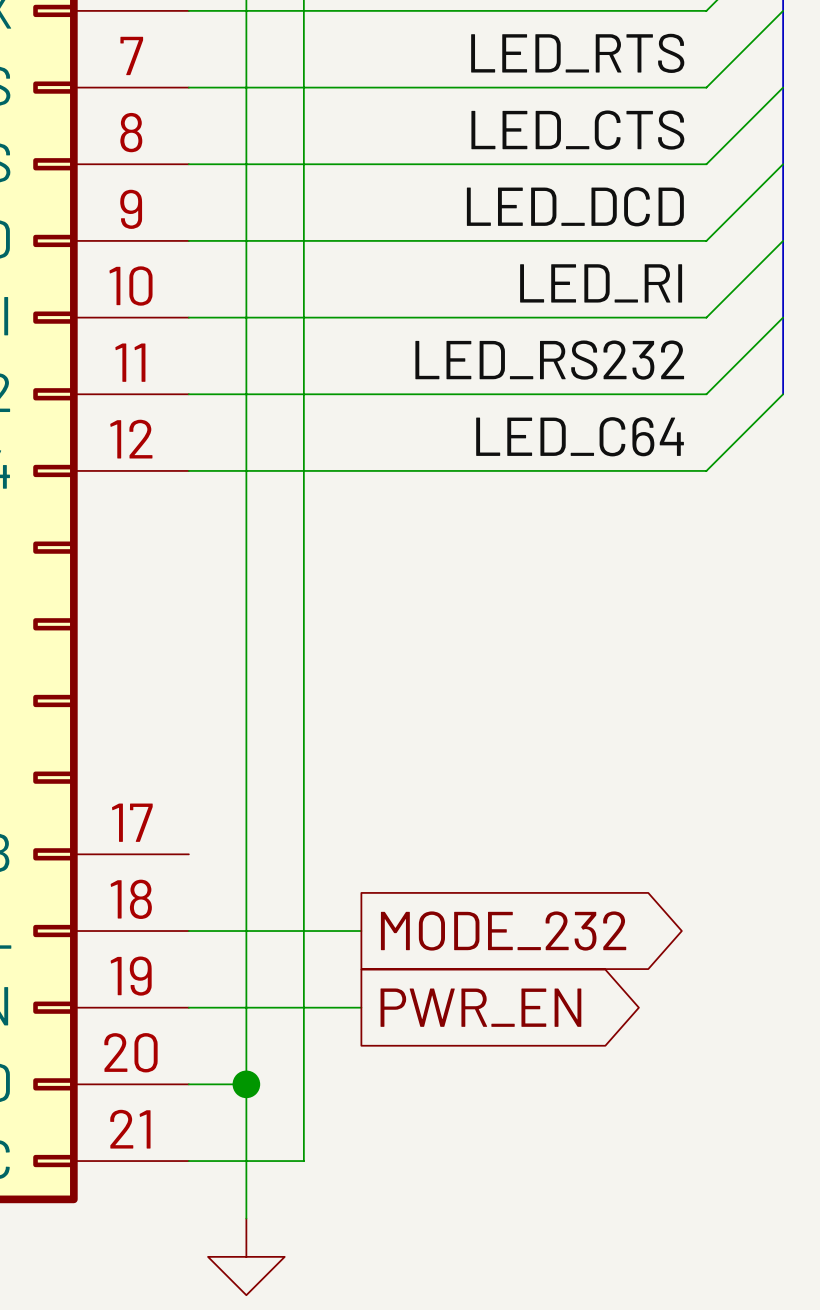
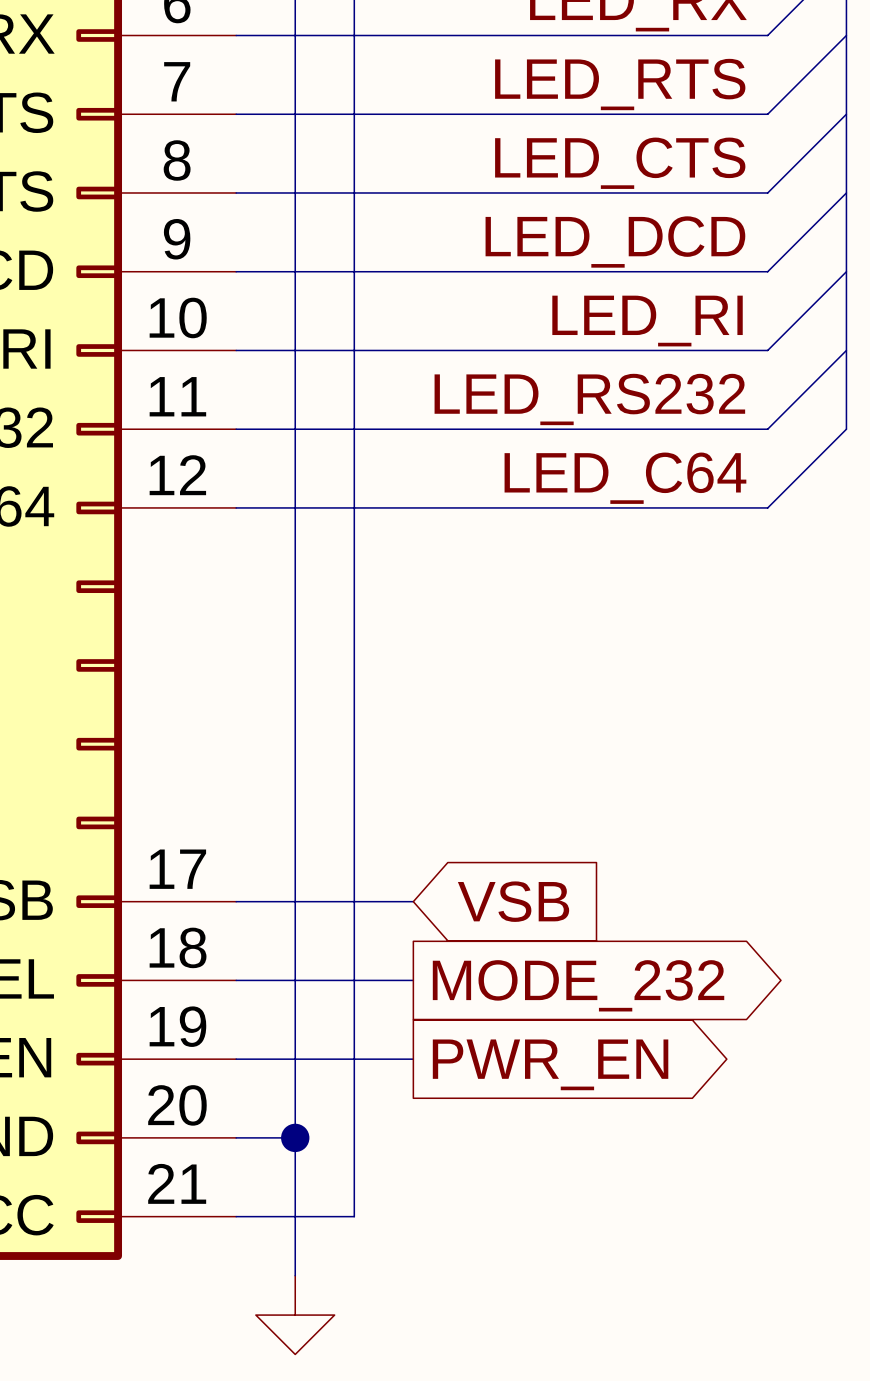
wire: none -> (236, 901) (413, 901)
global label: none -> VSB (513, 901)

